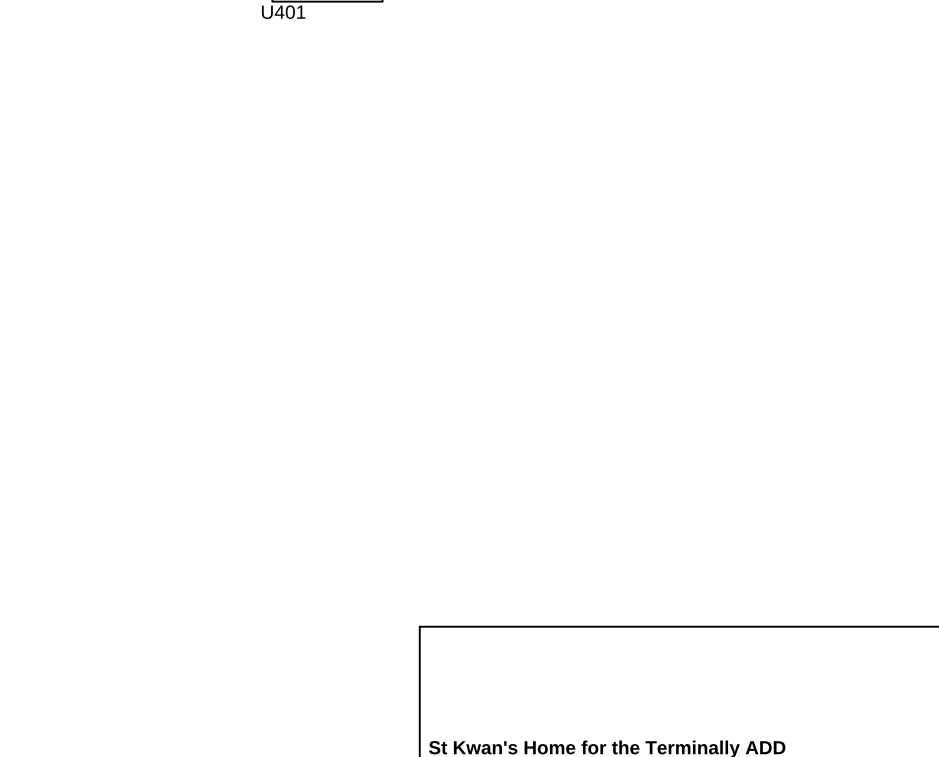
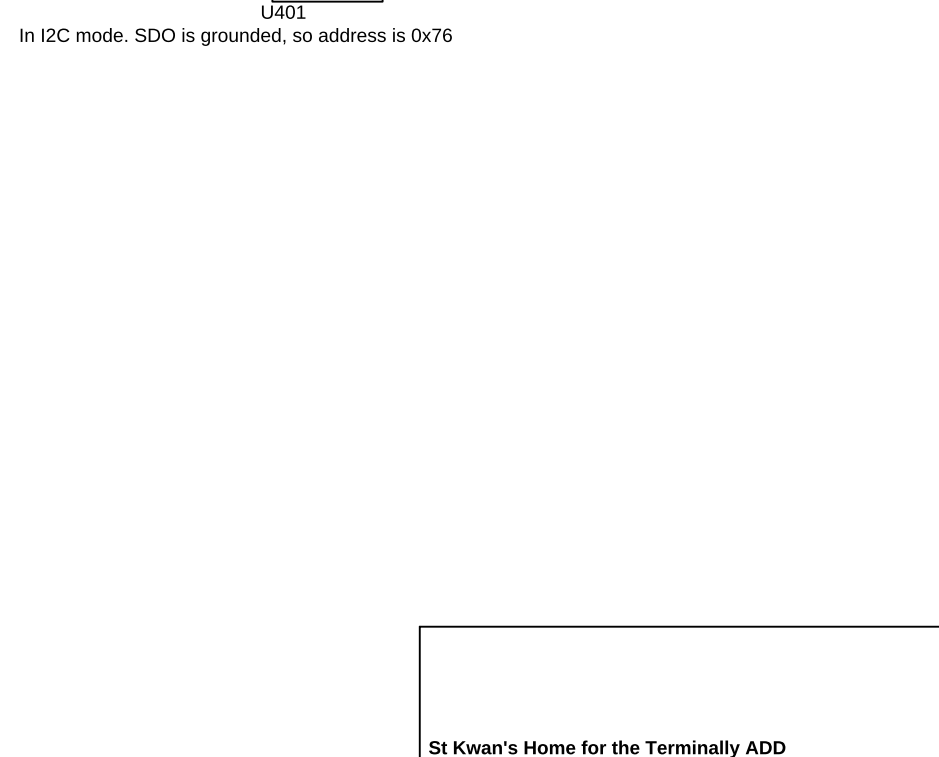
text: none -> In I2C mode. SDO is grounded, so address is 0x76 (236, 36)

